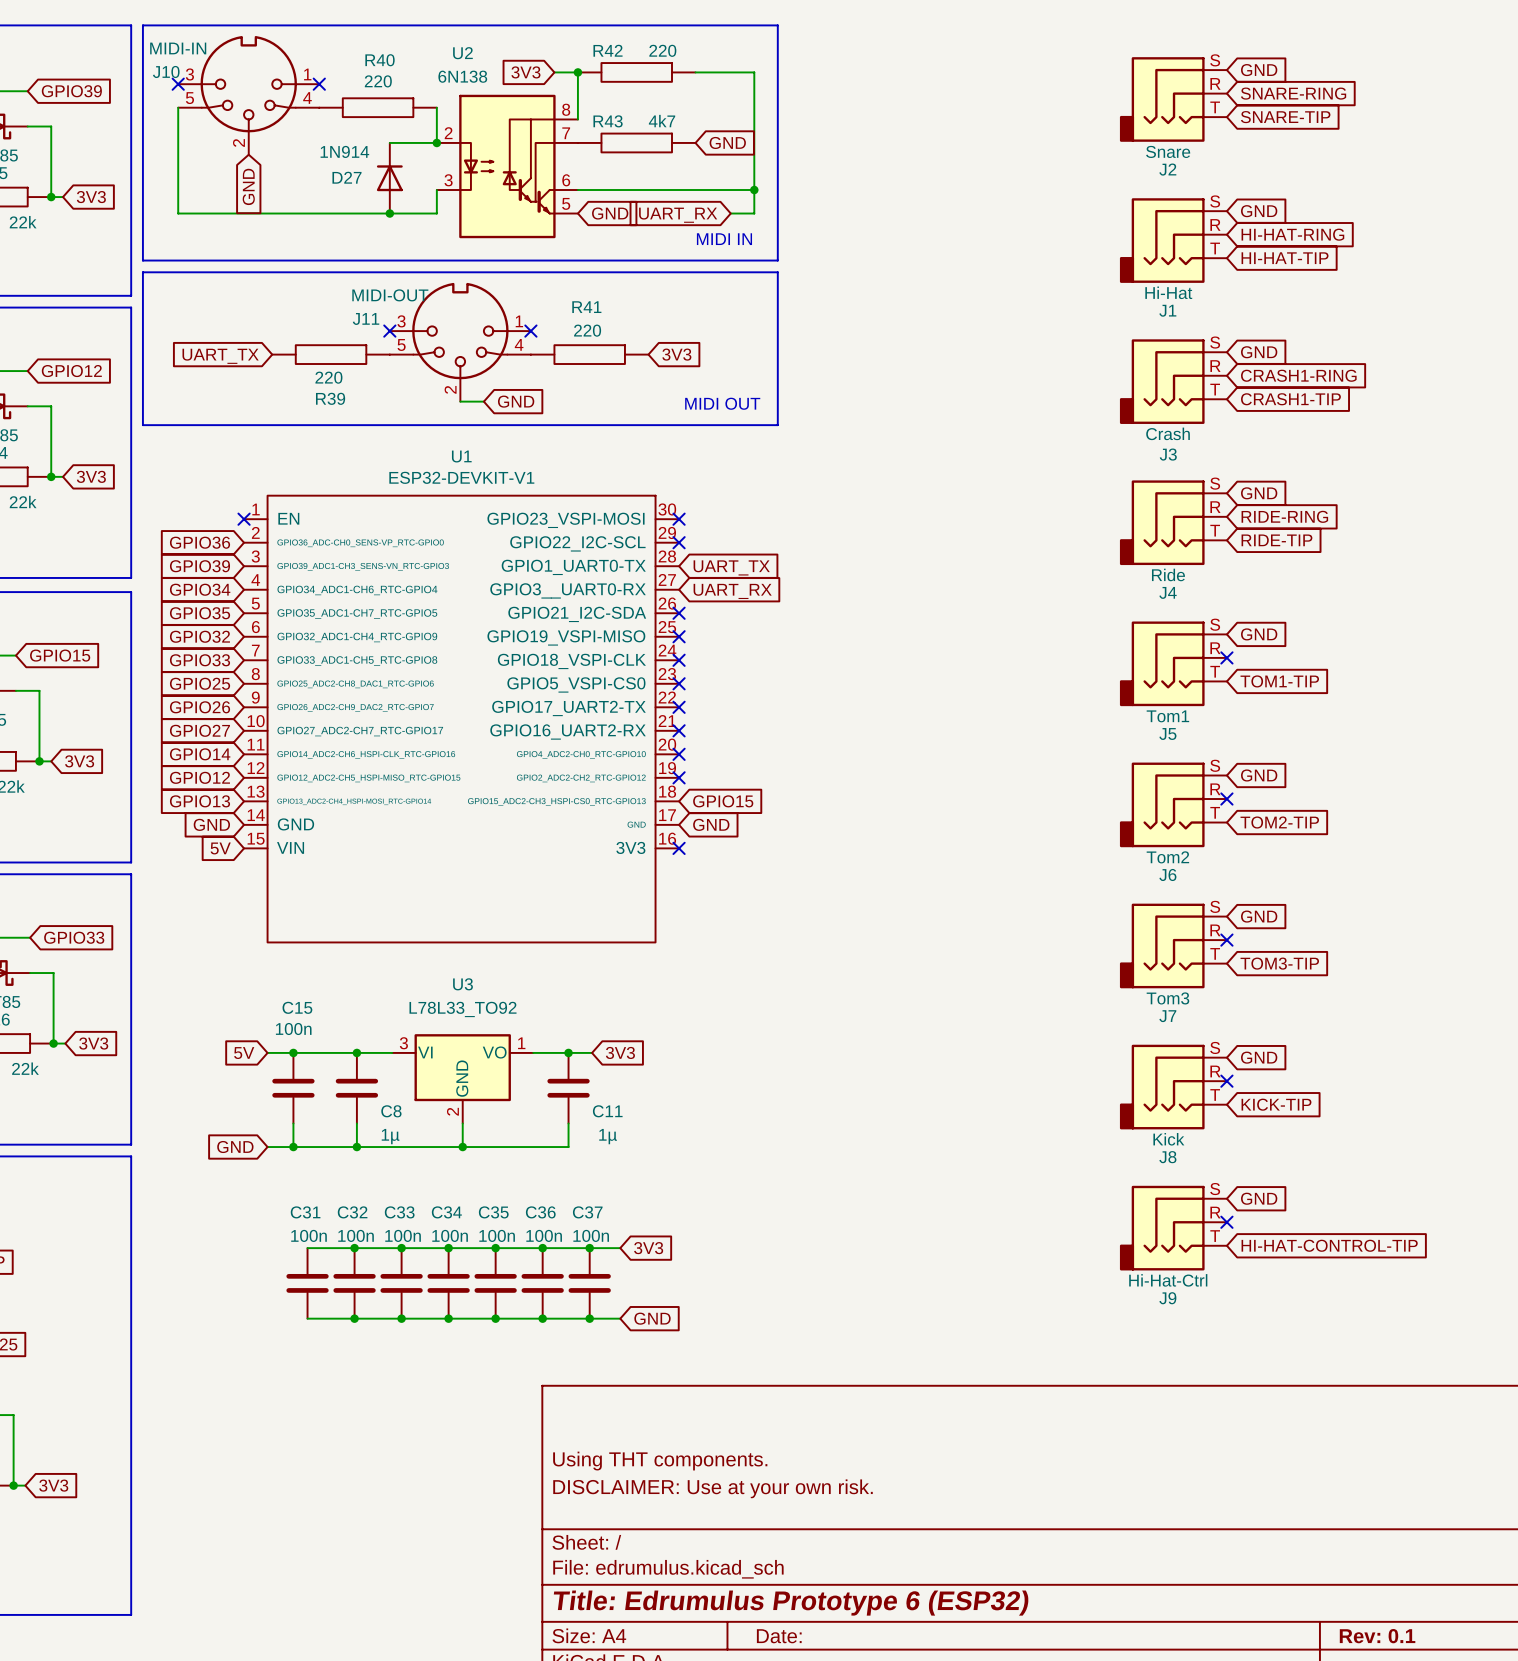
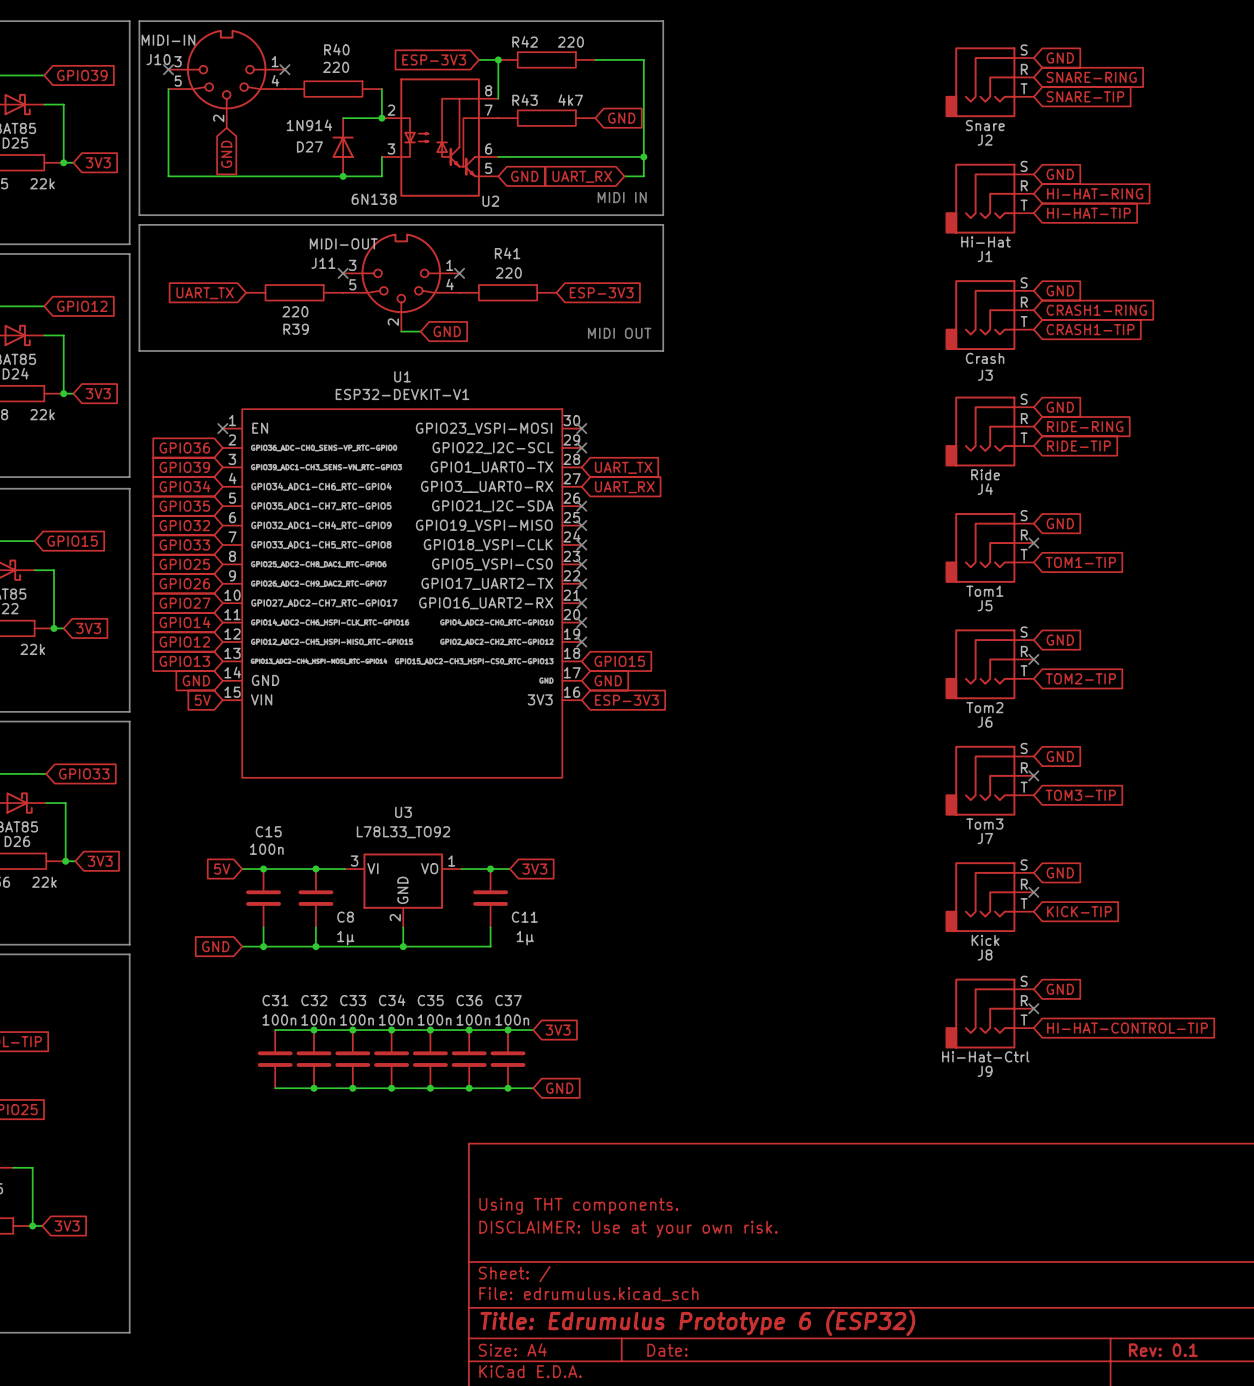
U2 name position: U2 (462, 53) -> U2 (490, 201)
global label: 3V3 (525, 72) -> ESP-3V3 (434, 59)
U2 value position: 6N138 (462, 76) -> 6N138 (374, 199)
global label: 3V3 (676, 354) -> ESP-3V3 (601, 292)
no-connect mark: (679, 848) -> none
global label: none -> ESP-3V3 (626, 700)

